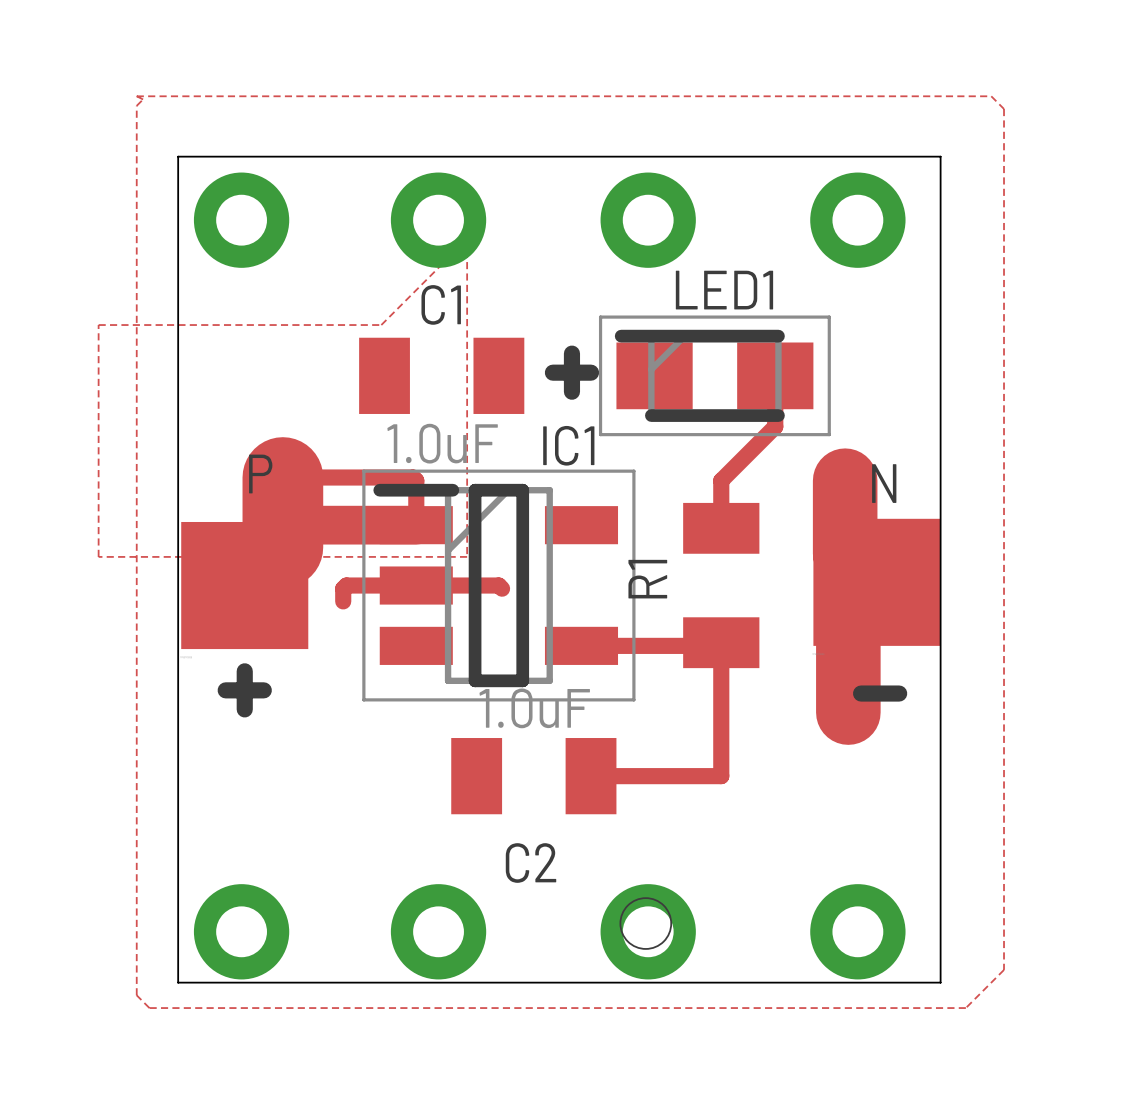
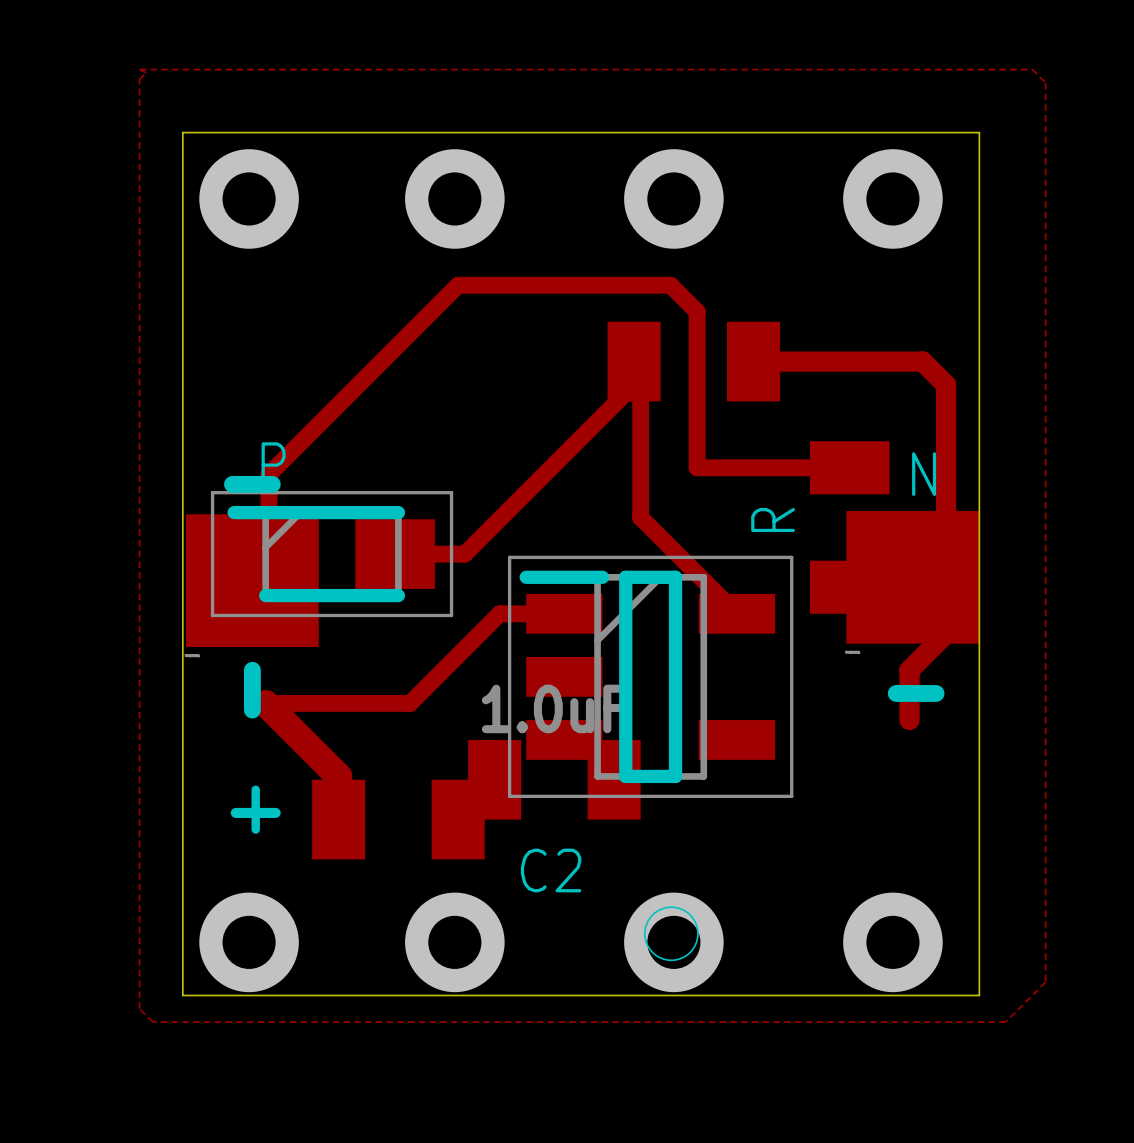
zone outline: (467, 239) (381, 325) (98, 325) (98, 556) (467, 556) (467, 239) -> none
line: (571, 353) (571, 391) -> (255, 789) (255, 829)
line: (552, 372) (591, 372) -> (232, 484) (272, 484)
C1: 1.0uF (441, 375) -> none
part: none -> (693, 361)
LED1: (714, 375) -> none
track: none -> (753, 361) (922, 361) (946, 384) (946, 633) (909, 670) (909, 720)
track: (775, 375) (775, 426) (721, 480) (721, 528) -> none
track: none -> (634, 378) (640, 384) (640, 517) (740, 617)
track: none -> (634, 378) (634, 361) (645, 373) (464, 554) (395, 554)
track: (282, 477) (413, 477) (416, 480) (416, 525) (289, 525) (244, 569) (244, 585) (282, 547) (282, 477) -> none
track: none -> (849, 467) (697, 467) (697, 311) (670, 285) (458, 285) (268, 474) (268, 554)
track: (845, 480) (845, 553) (873, 582) (876, 582) (848, 610) (848, 712) -> none
R: none -> (849, 527)
part: none -> (332, 554)
IC1: (498, 585) -> none
R1: (721, 585) -> none
track: (502, 588) (498, 585) (346, 585) (343, 588) (343, 601) -> none
track: none -> (564, 613) (499, 613) (410, 703) (265, 703) (338, 776) (338, 819)
track: (581, 645) (718, 645) (721, 642) (721, 776) (591, 776) -> none
part: none -> (650, 676)
line: (225, 690) (263, 690) -> (235, 812) (275, 812)
part: none -> (398, 819)

